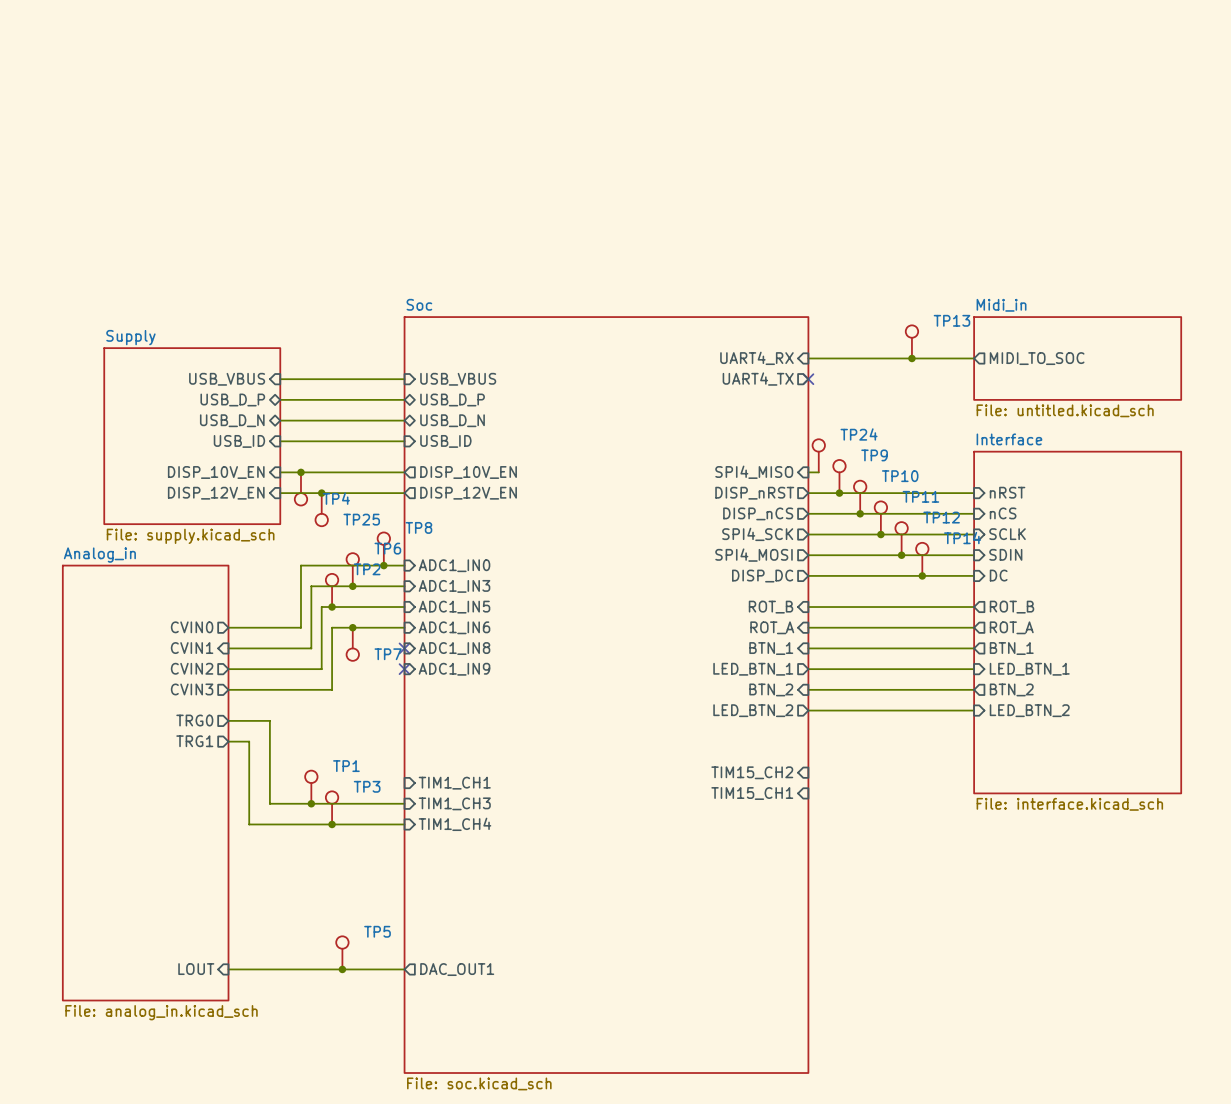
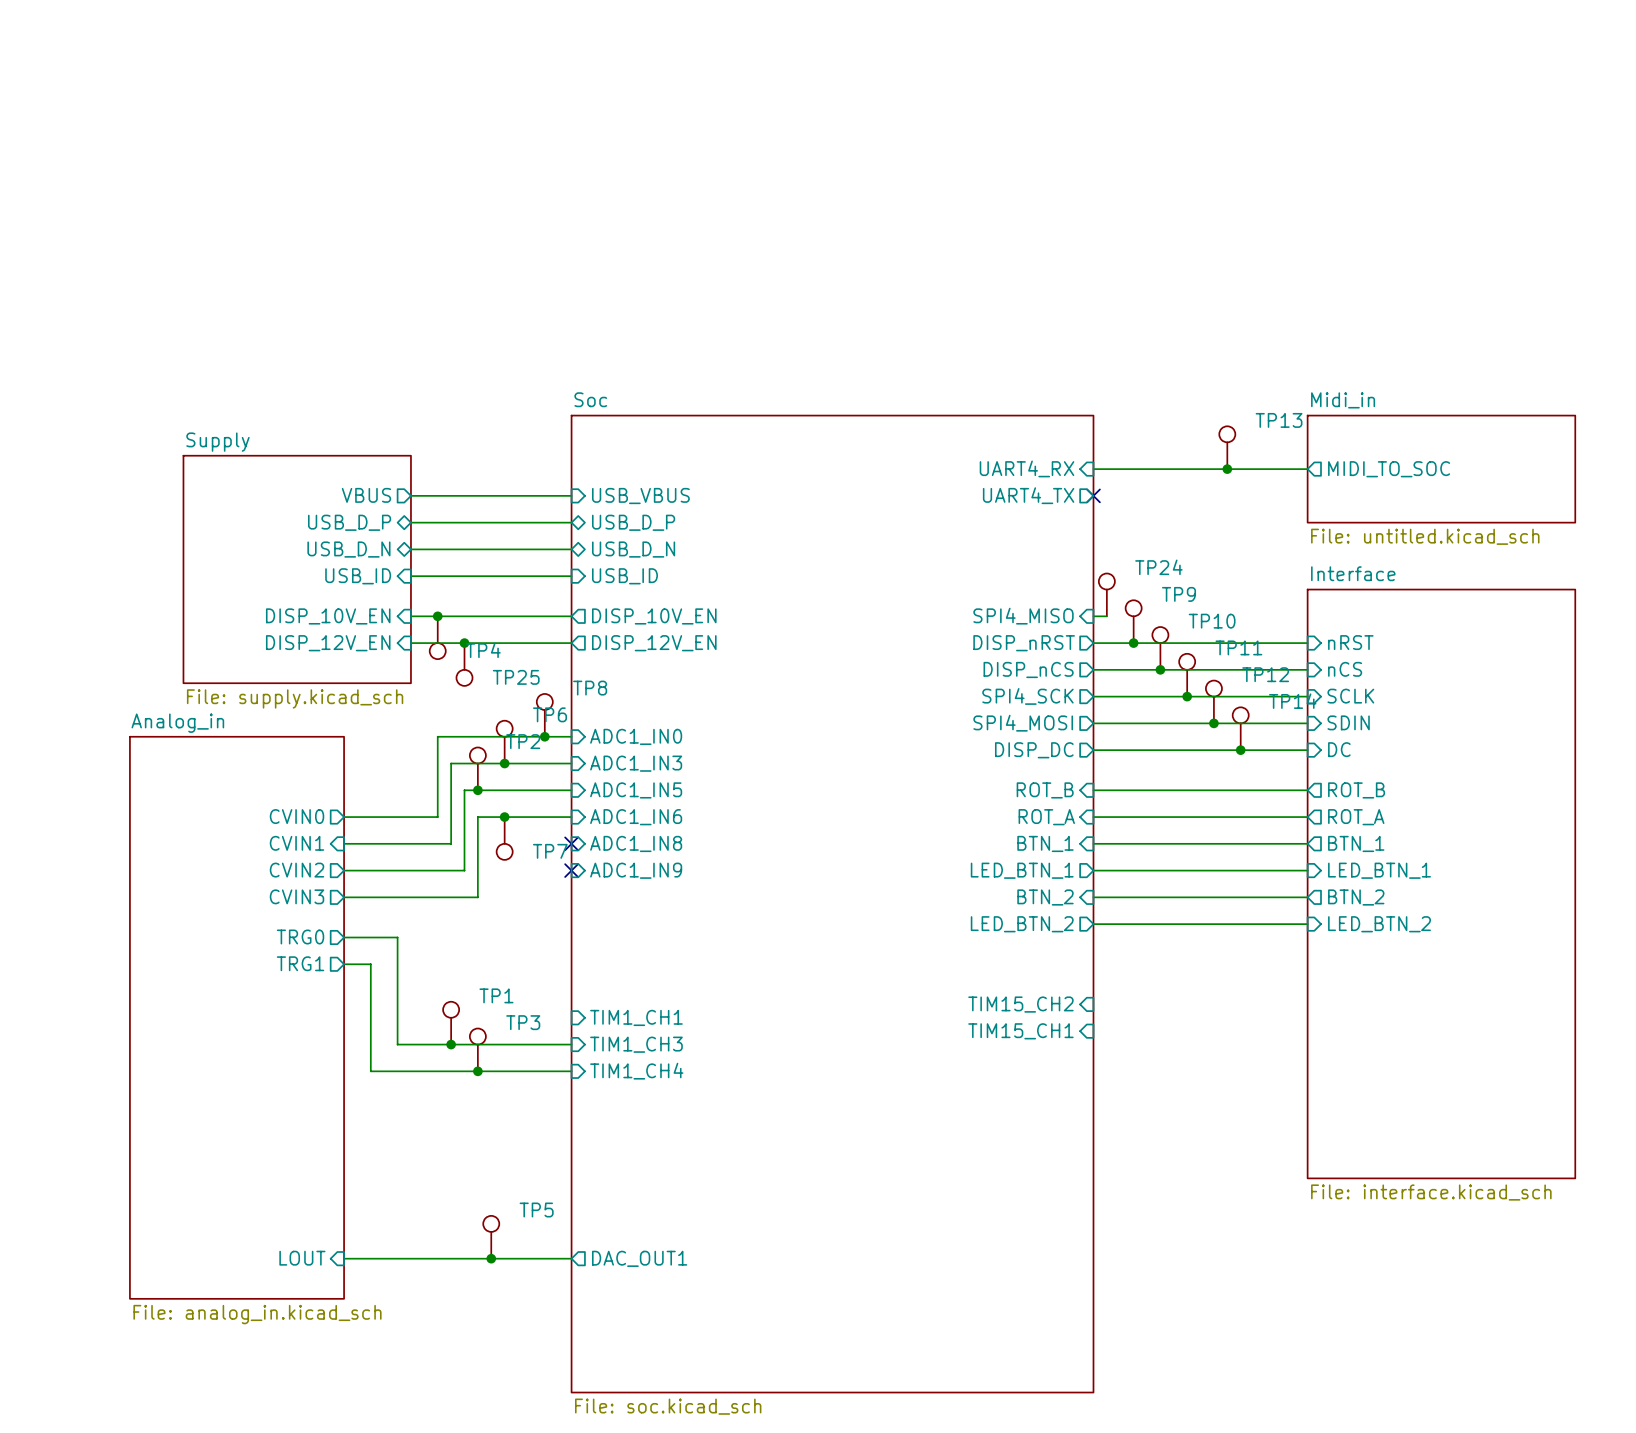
sheet pin shape: input (227, 379) -> output (366, 495)
sheet pin: USB_VBUS (227, 379) -> VBUS (366, 495)
sheet Interface: File: interface.kicad_sch (1077, 622) -> none
sheet Interface: none -> File: interface.kicad_sch (1441, 883)

